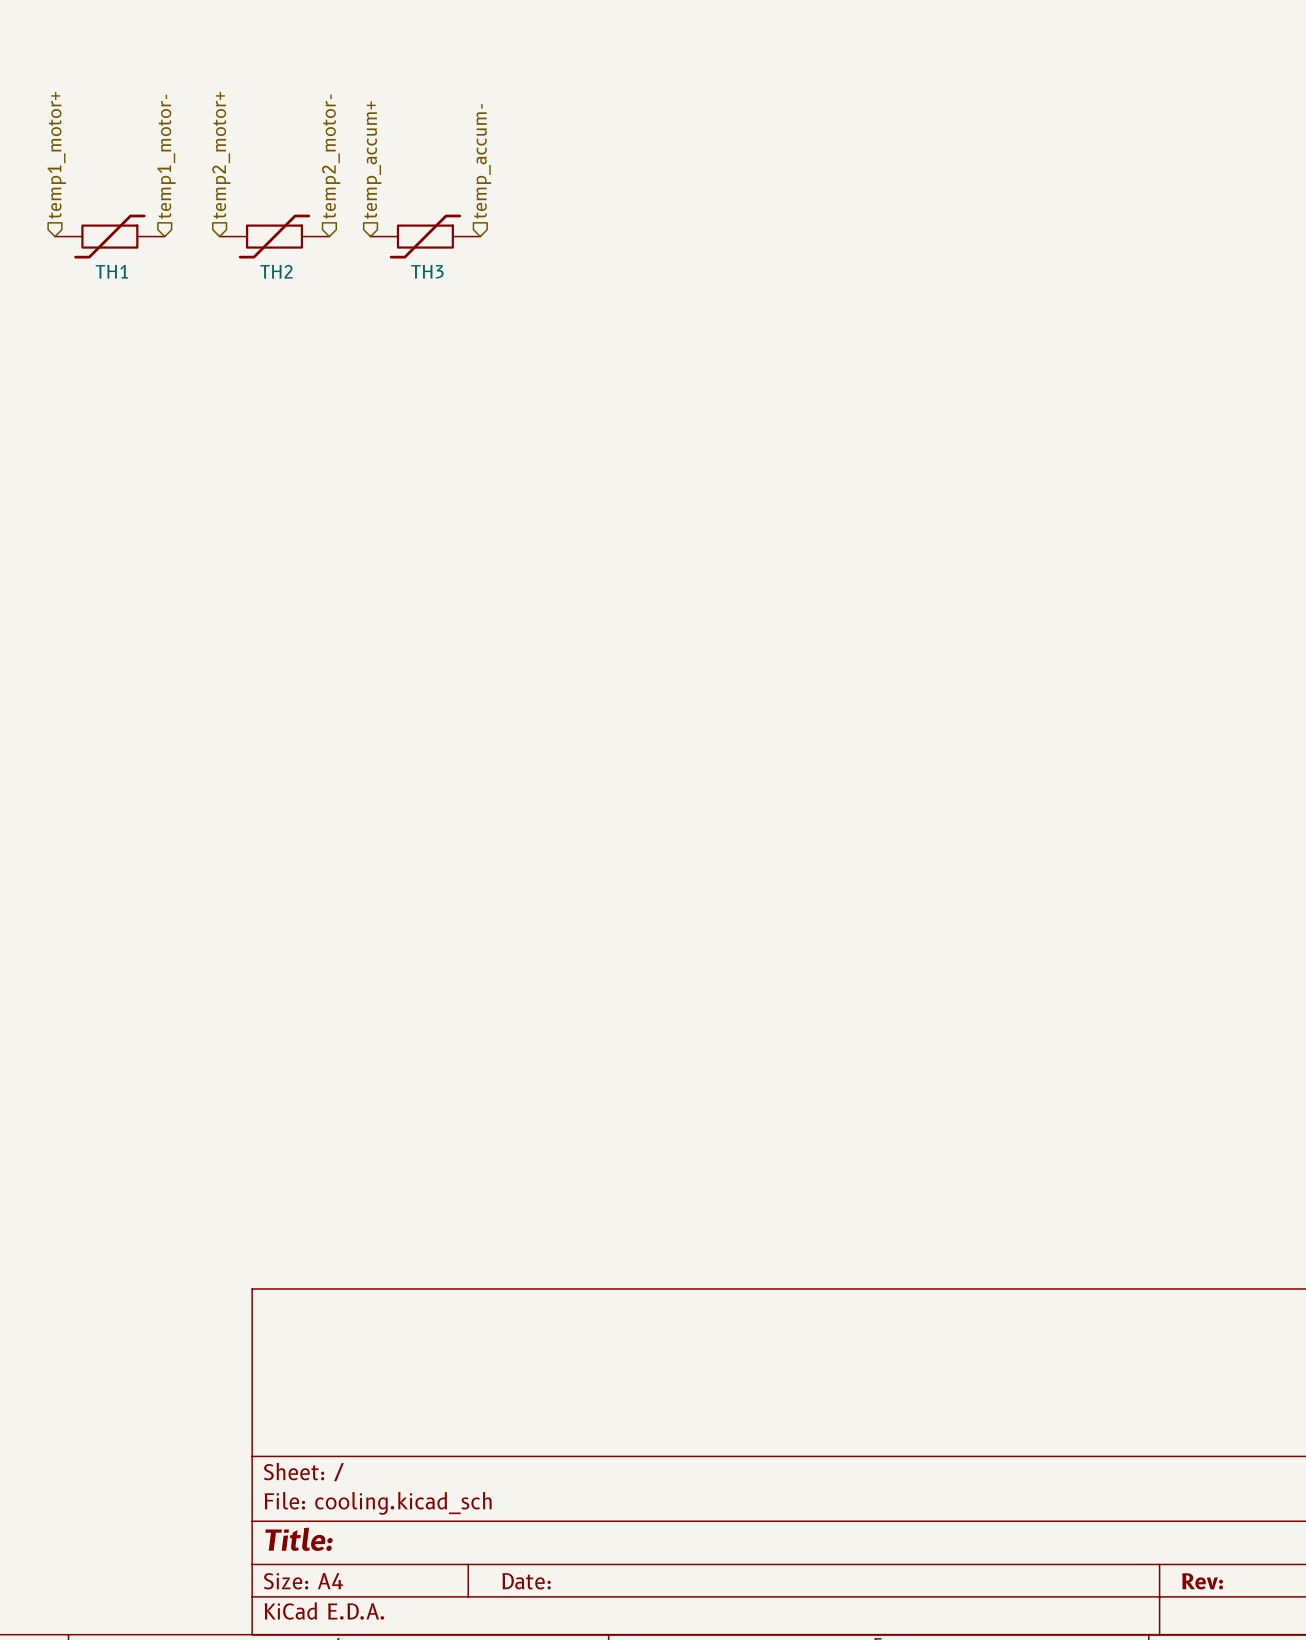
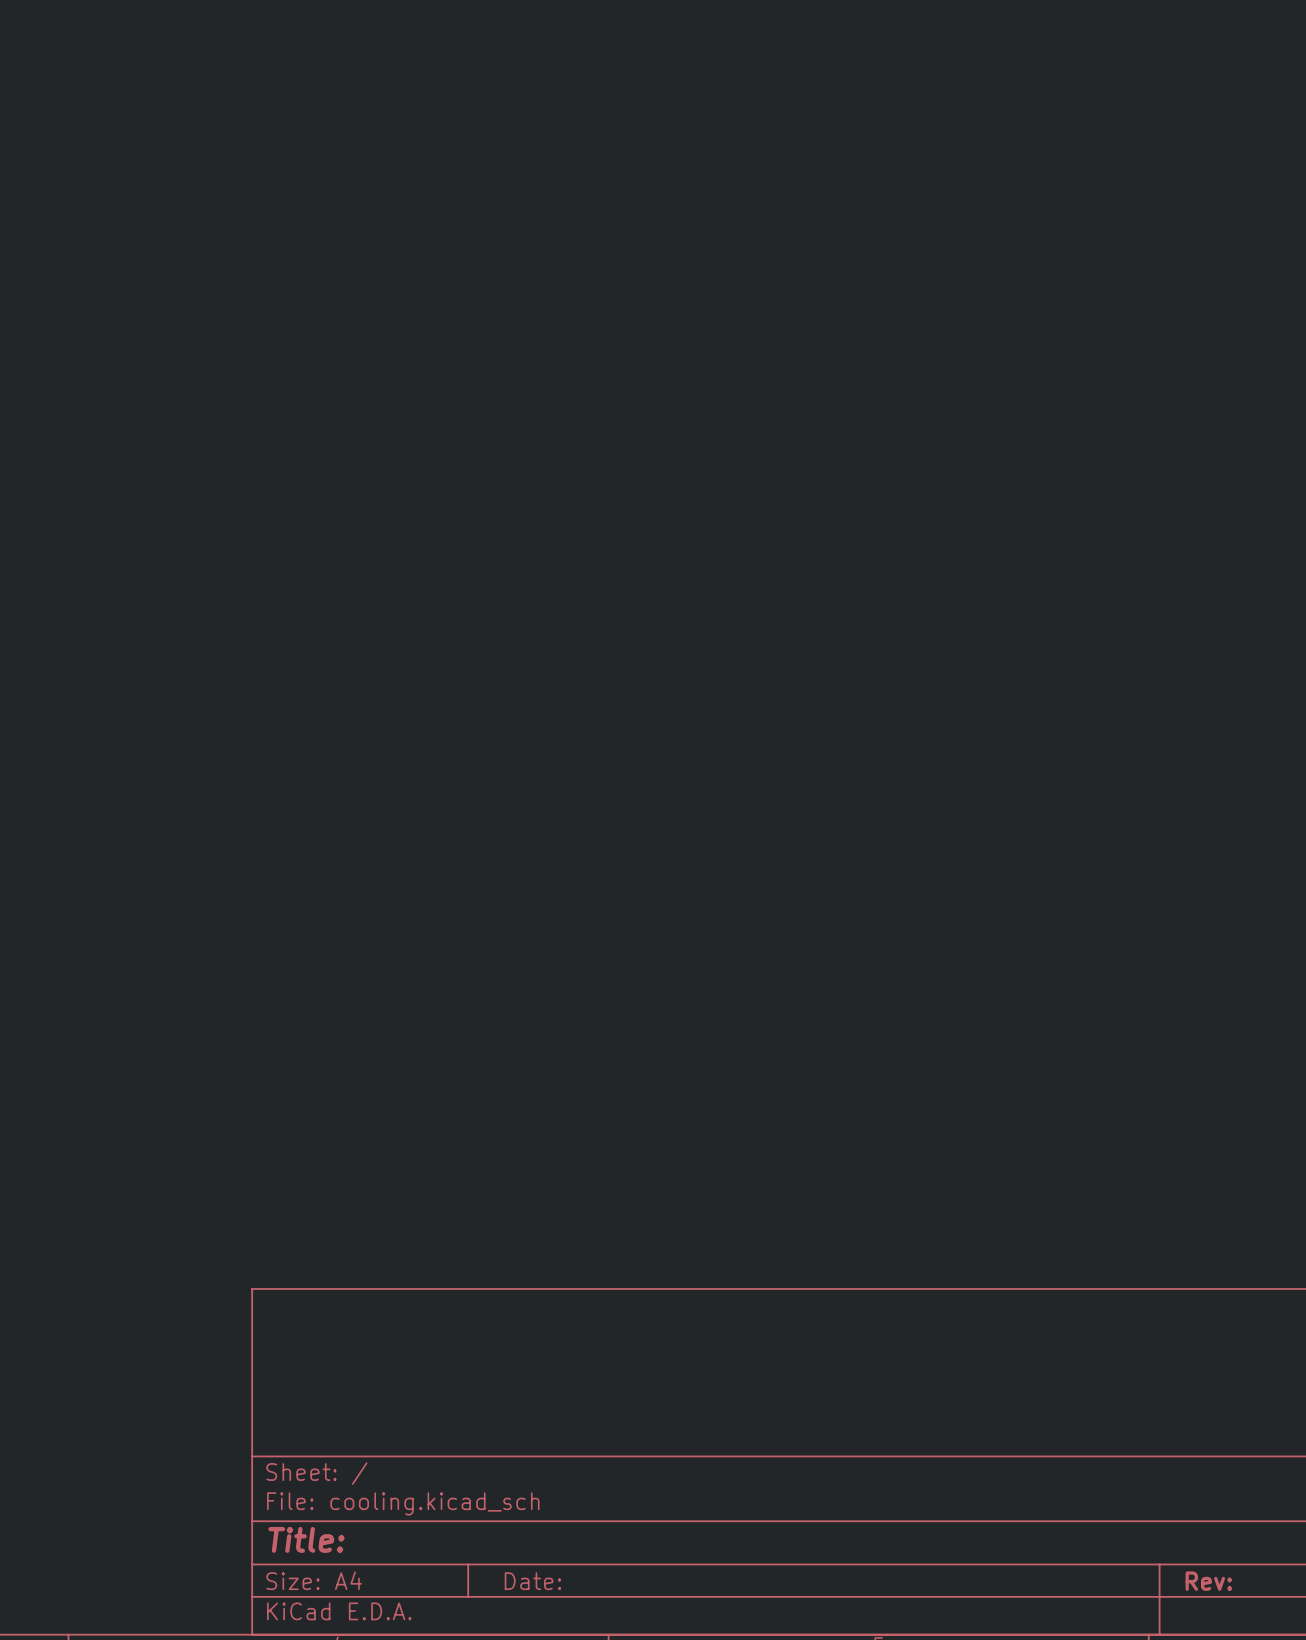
hierarchical label: temp1_motor+ (56, 155) -> none
hierarchical label: temp2_motor+ (221, 155) -> none
hierarchical label: temp1_motor- (166, 156) -> none
hierarchical label: temp2_motor- (331, 156) -> none
hierarchical label: temp_accum+ (372, 160) -> none
hierarchical label: temp_accum- (482, 161) -> none
TH1: (109, 236) -> none
TH2: (274, 236) -> none
TH3: (425, 236) -> none

